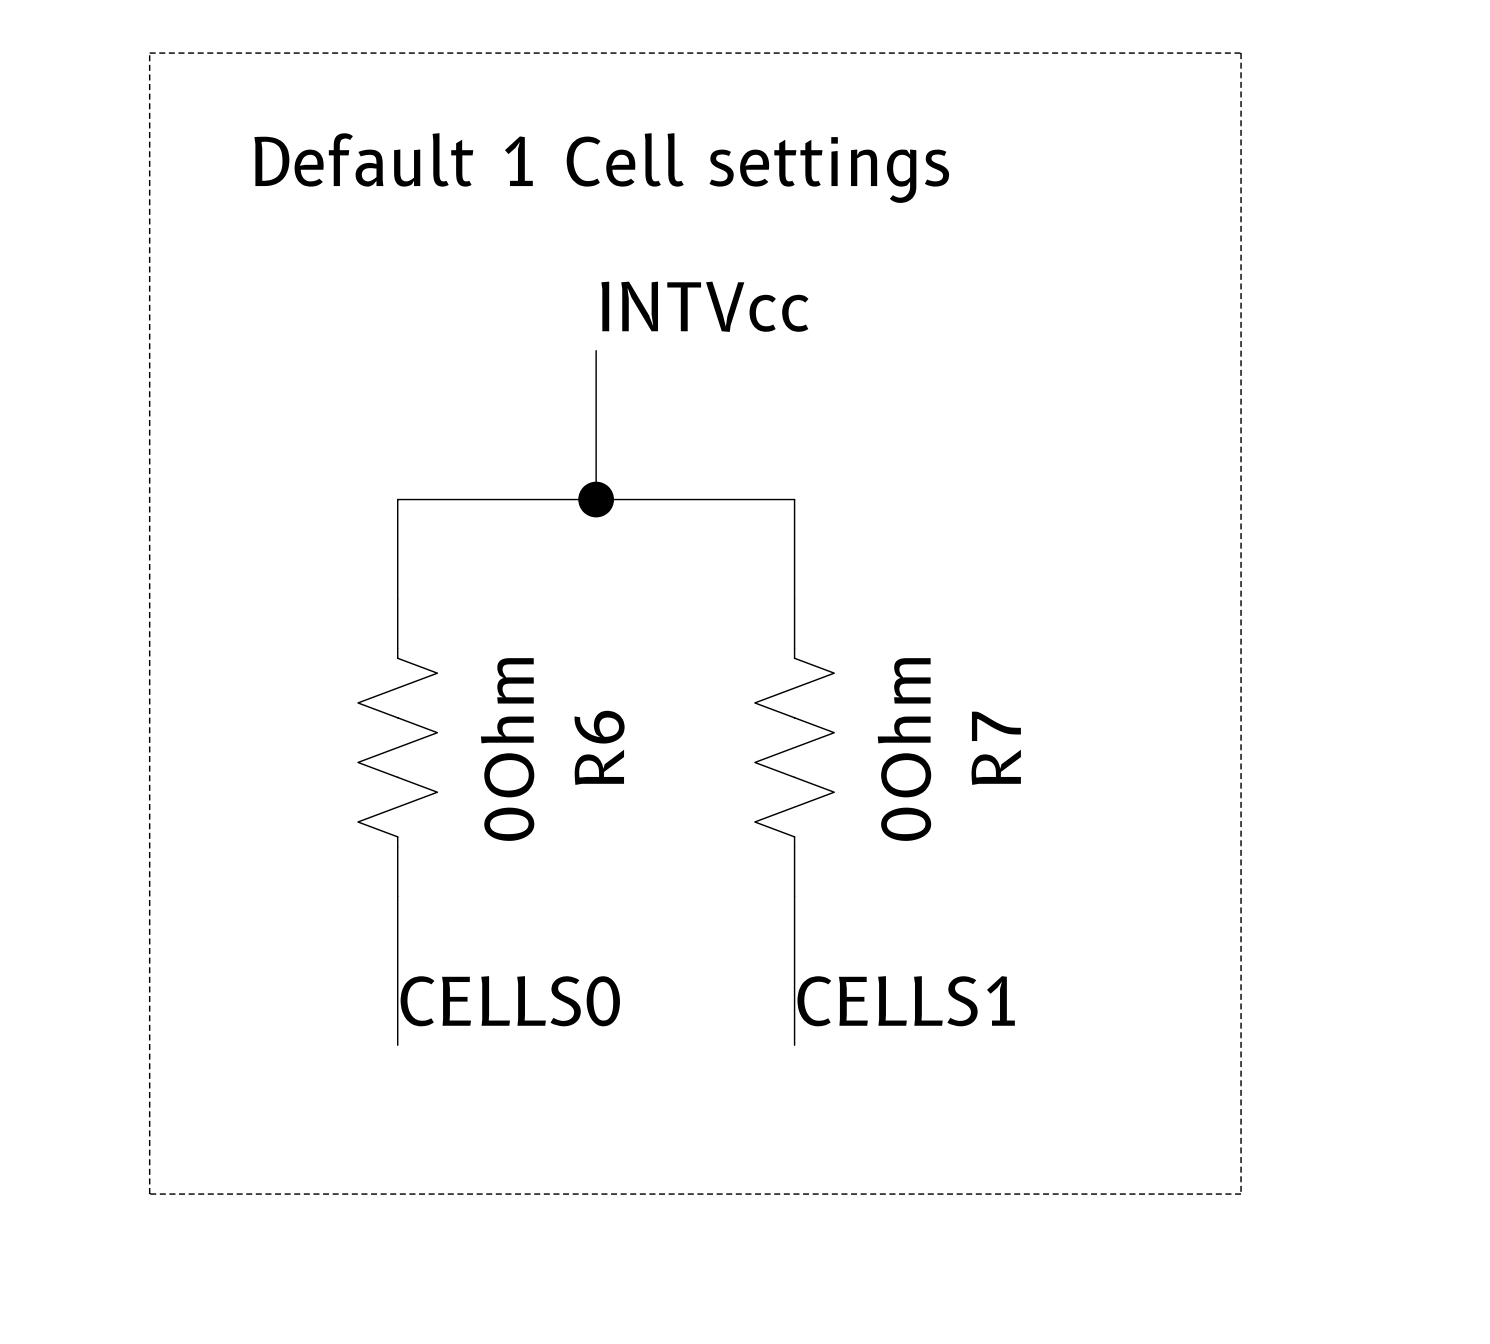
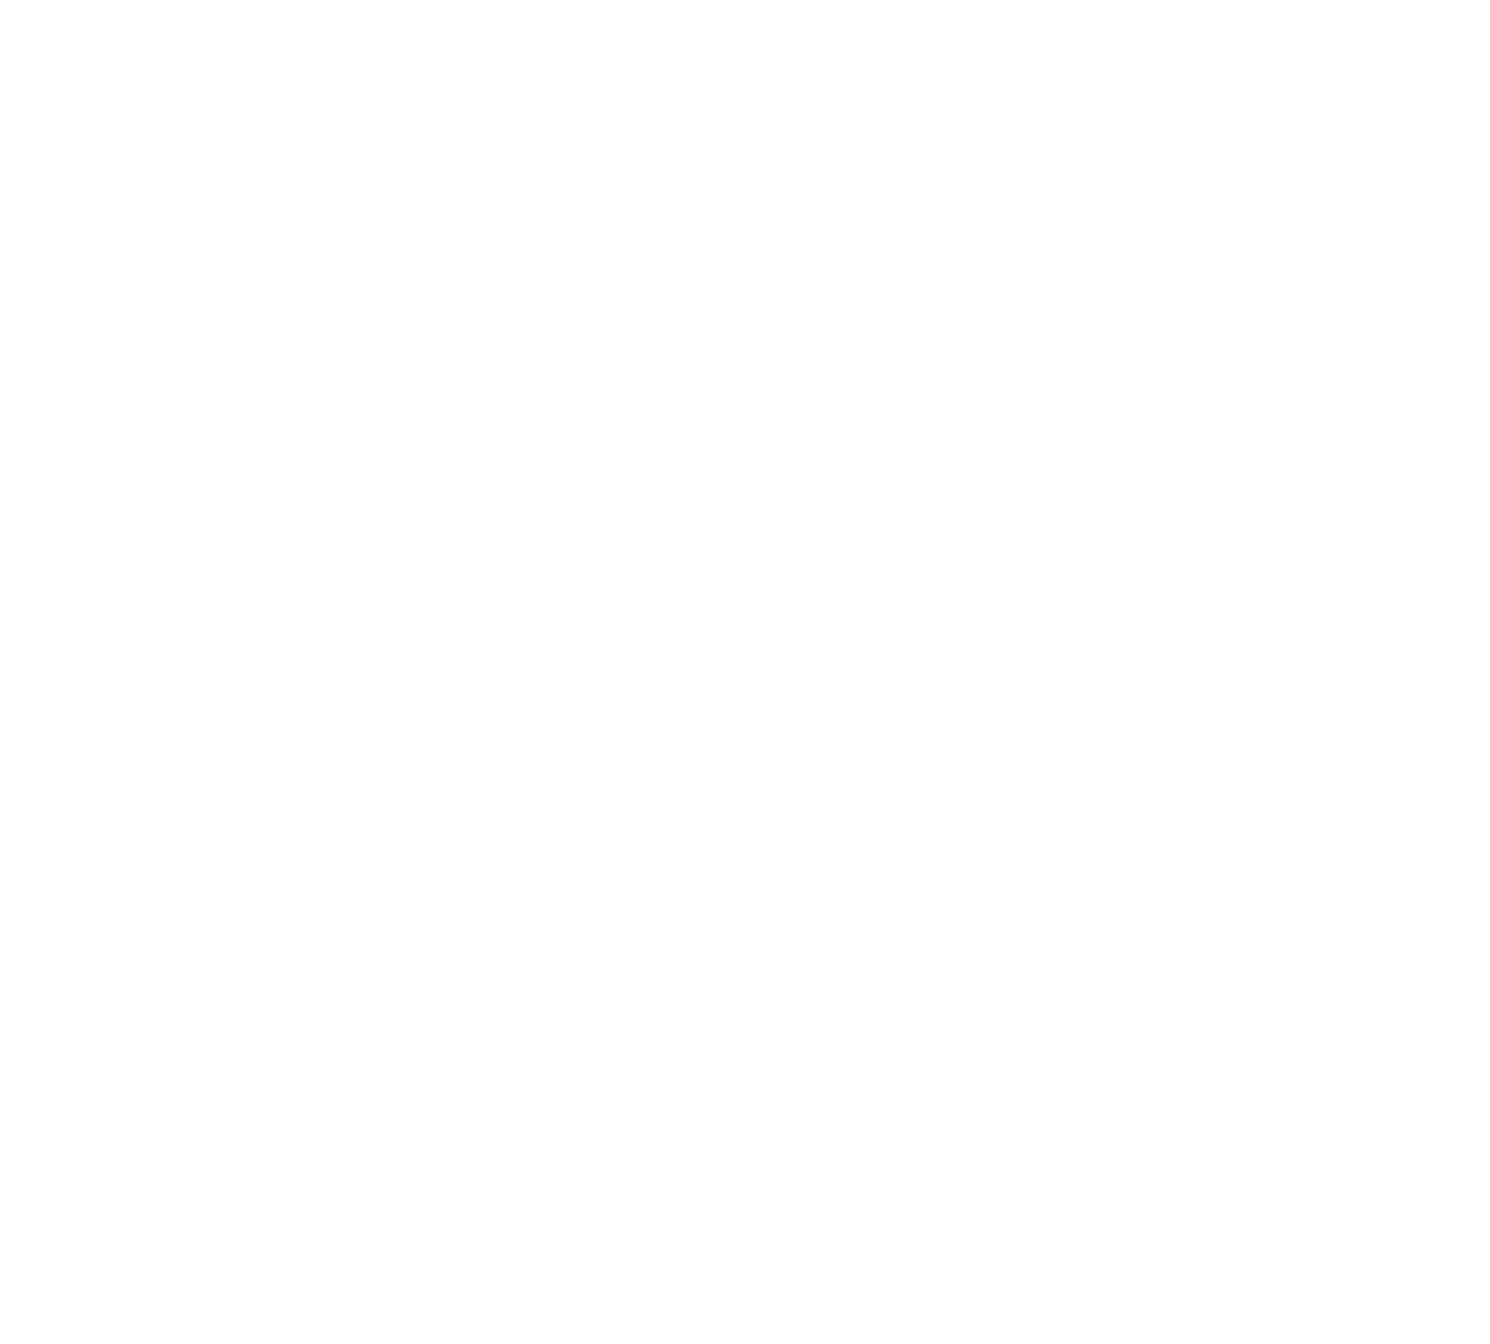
line: (149, 53) (1241, 53) (1241, 1194) (149, 1194) (149, 53) -> none
text: Default 1 Cell settings (601, 168) -> none
label: INTVcc (704, 306) -> none
wire: (596, 350) (596, 499) -> none
junction: (596, 499) -> none
wire: (397, 598) (397, 499) (794, 499) (794, 598) -> none
R6: 0Ohm (397, 747) -> none
R7: 0Ohm (794, 747) -> none
wire: (397, 896) (397, 1045) -> none
wire: (794, 896) (794, 1045) -> none
label: CELLS0 (510, 1001) -> none
label: CELLS1 (906, 1001) -> none

